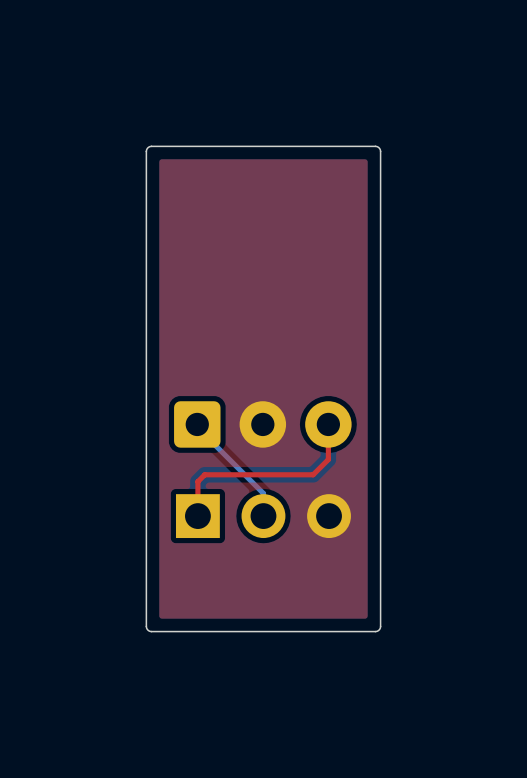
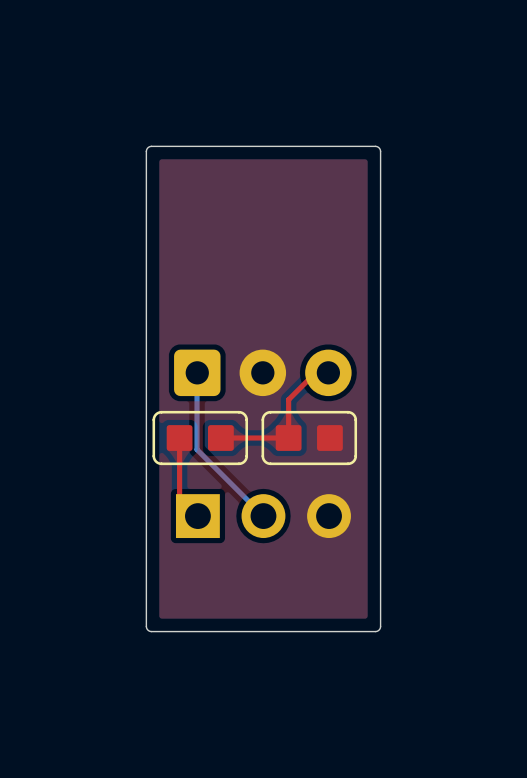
top track: none -> (328, 359) (288, 399) (288, 438) (220, 438)
bottom track: (197, 424) (197, 427) (263, 493) (263, 516) -> (197, 360) (197, 449) (263, 516)
part position: (262, 424) -> (262, 372)
top track: (328, 424) (328, 459) (313, 474) (204, 474) (197, 481) (197, 516) -> (179, 438) (179, 497) (197, 516)
part: none -> (200, 438)
part: none -> (309, 438)

